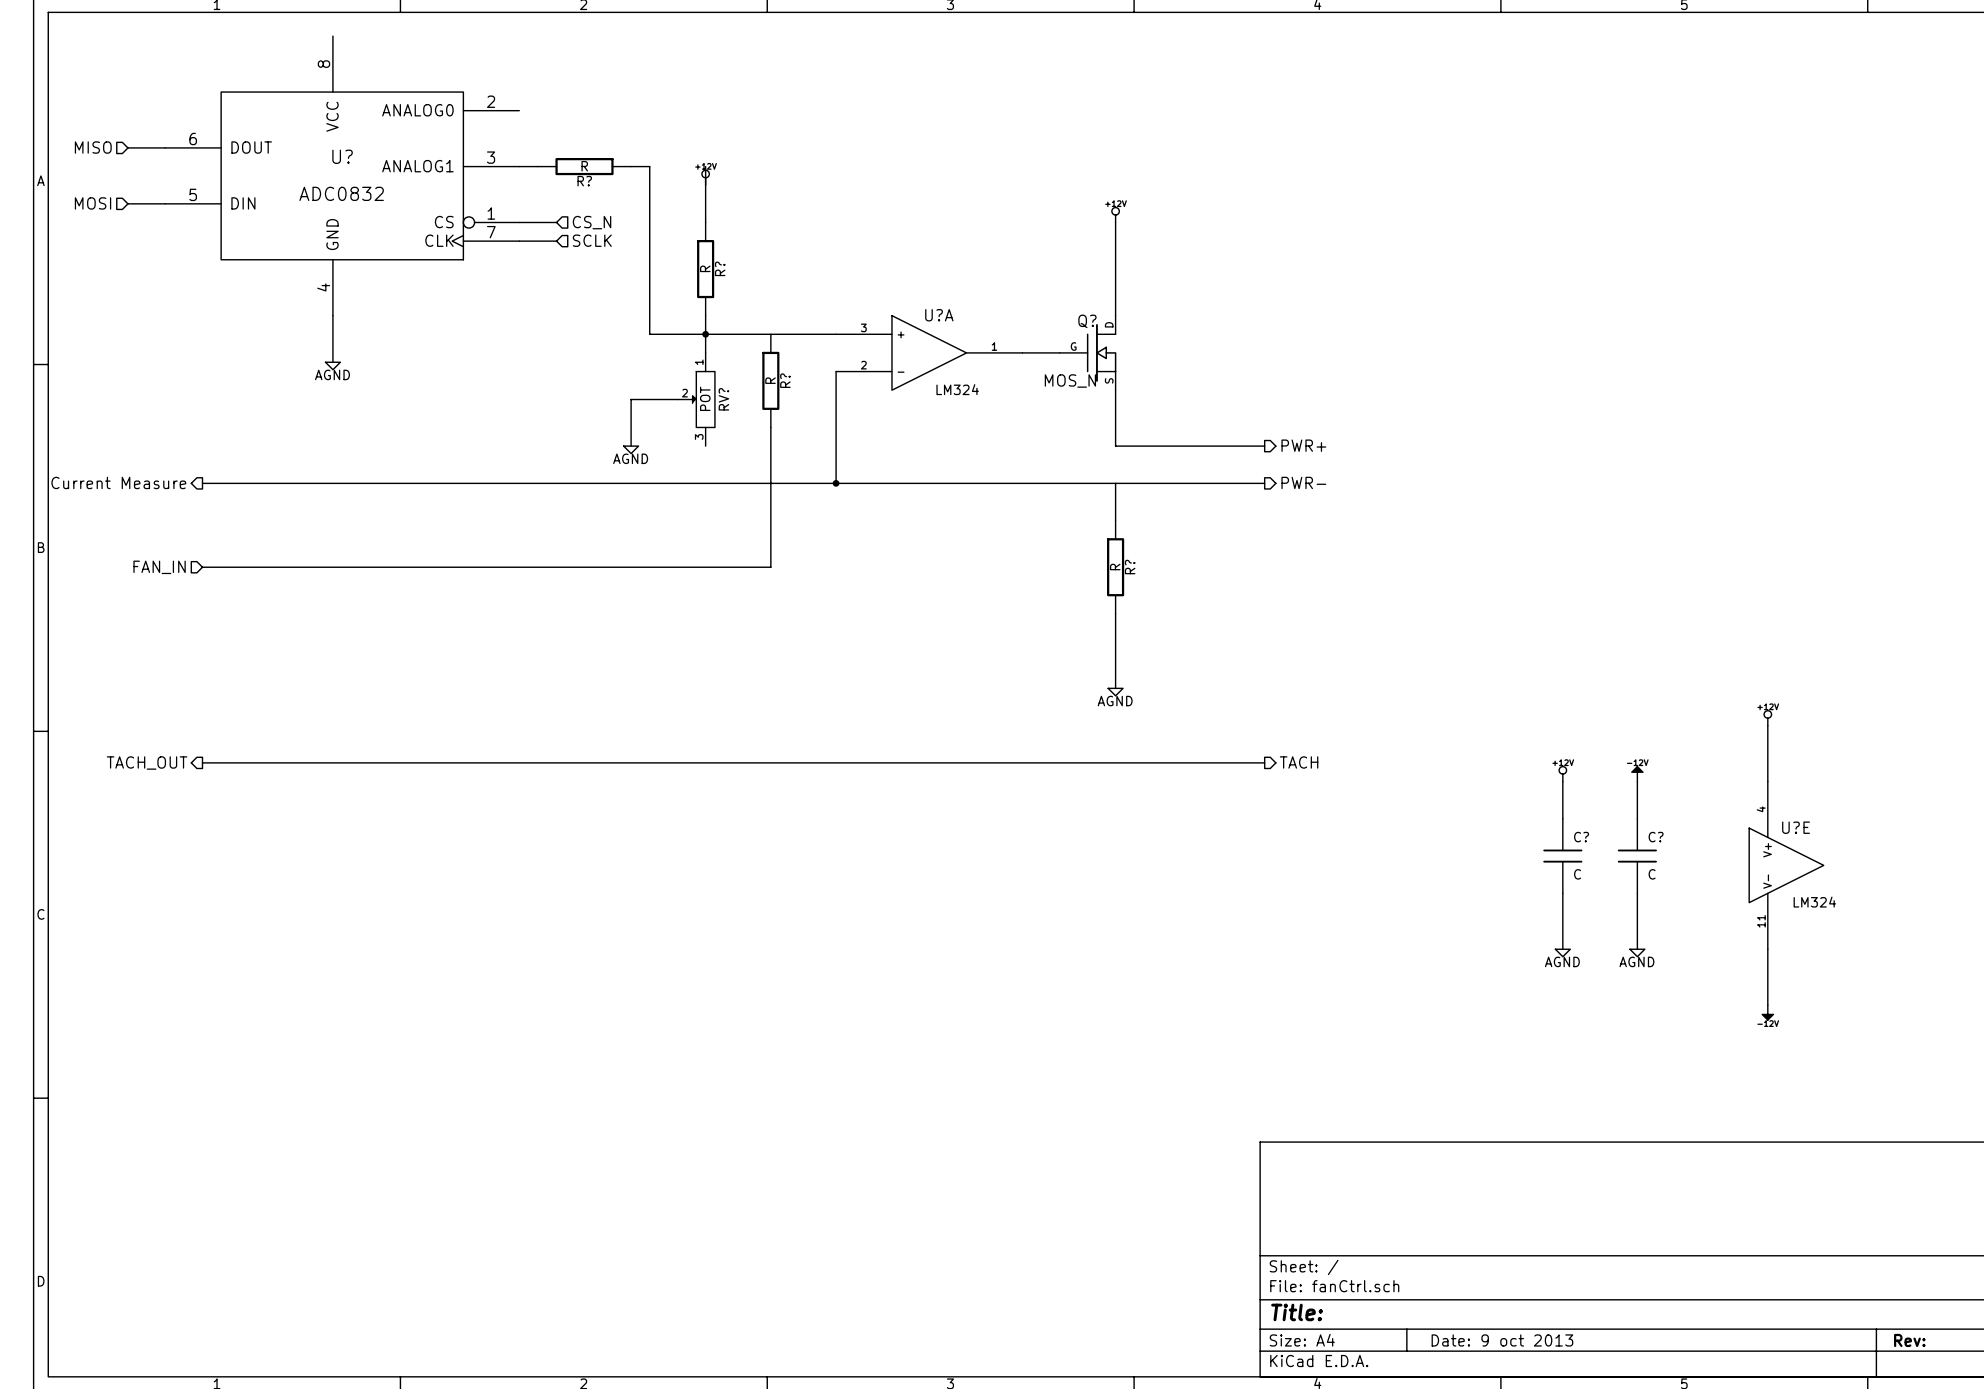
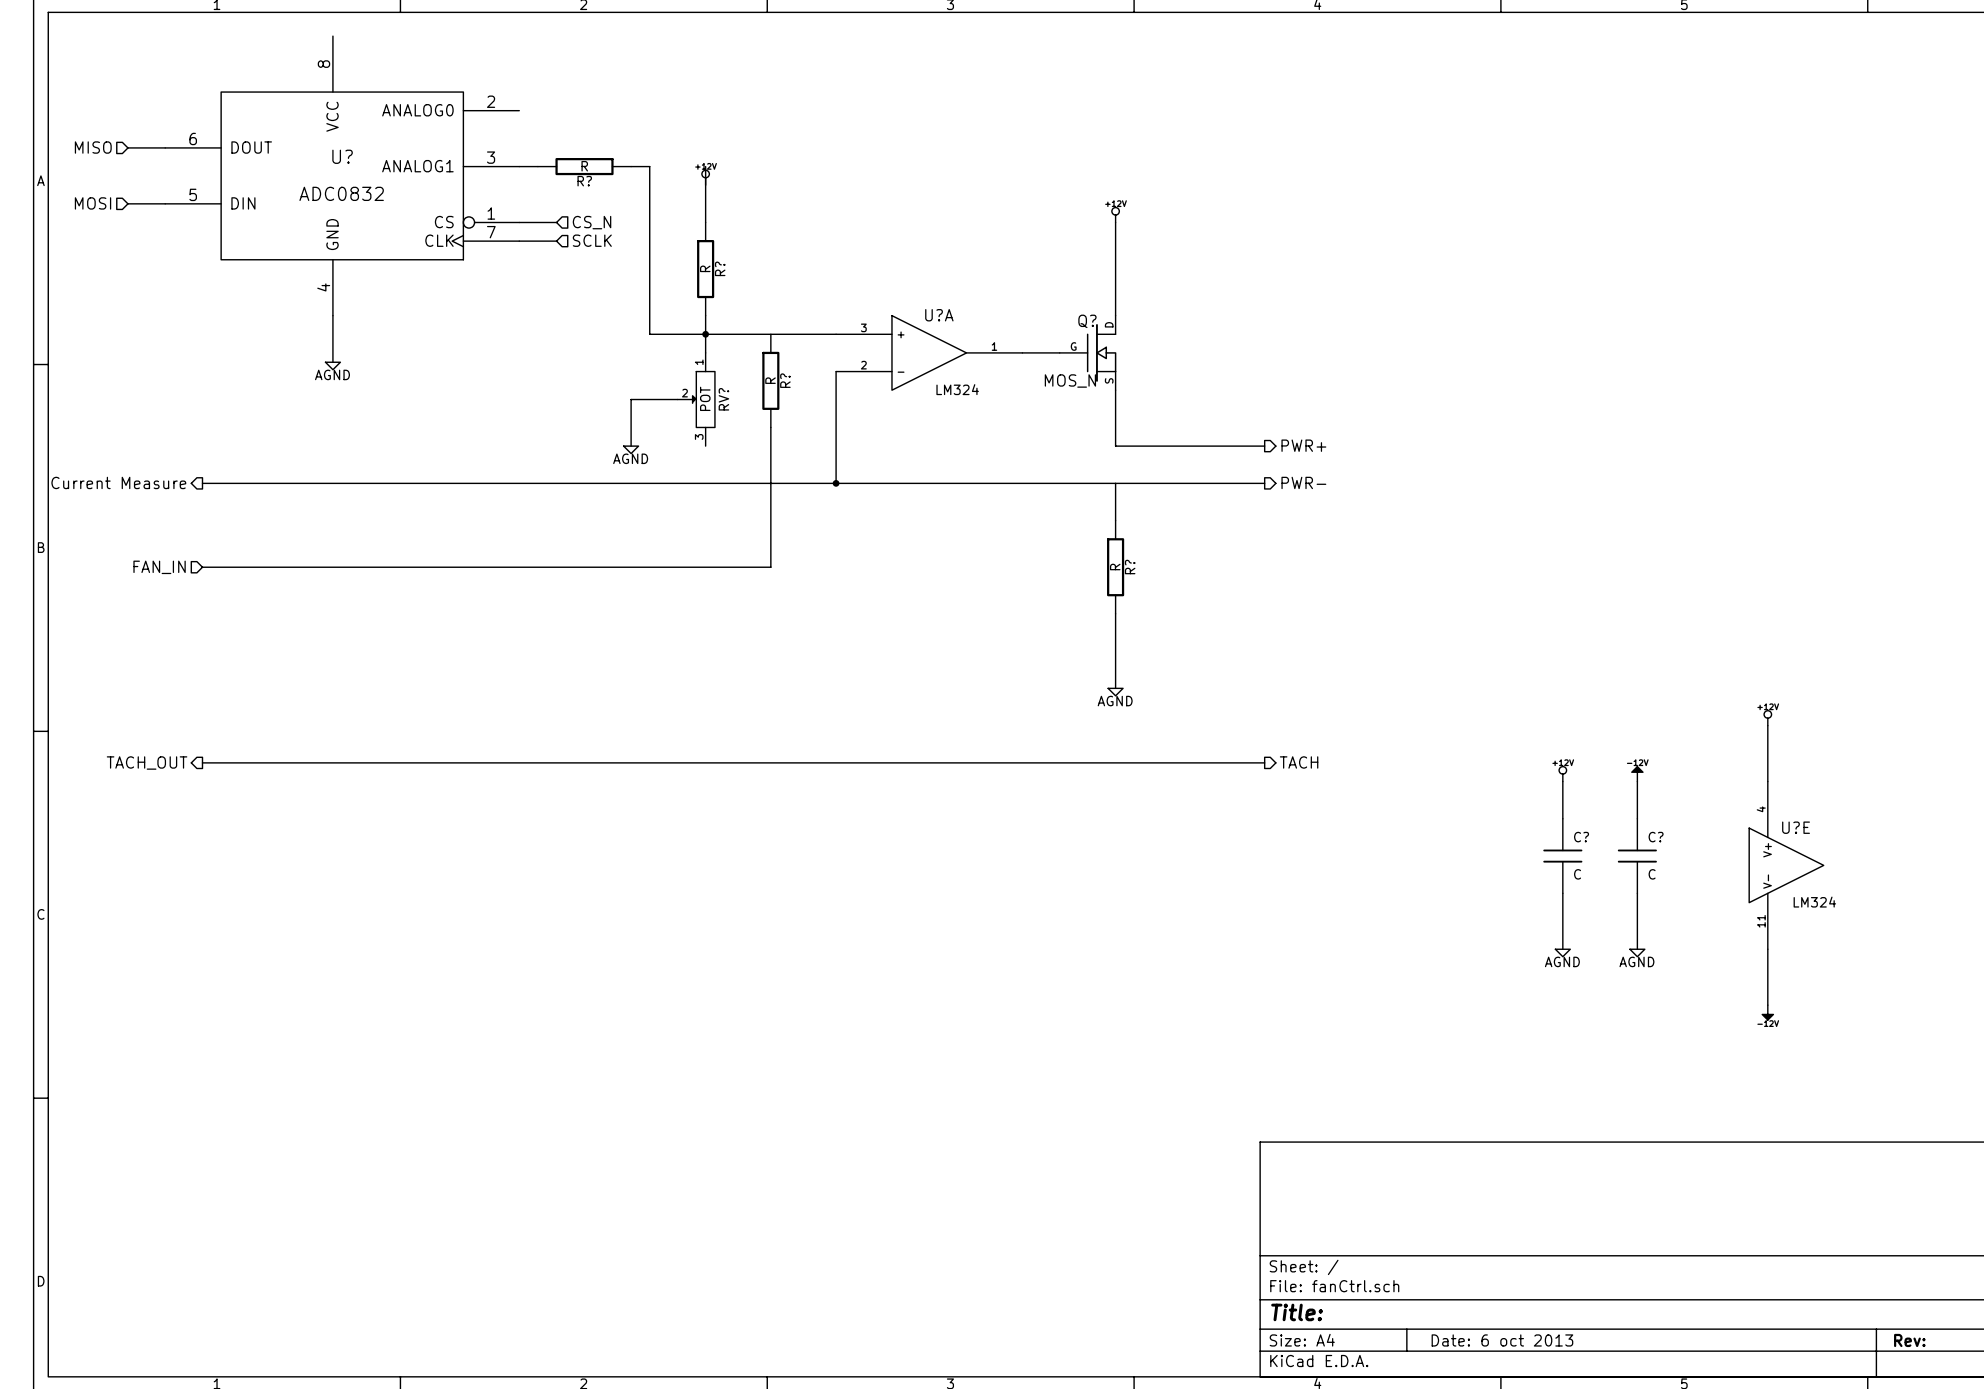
title block: Date: 9 oct 2013 (1502, 1340) -> Date: 6 oct 2013 (1502, 1340)

